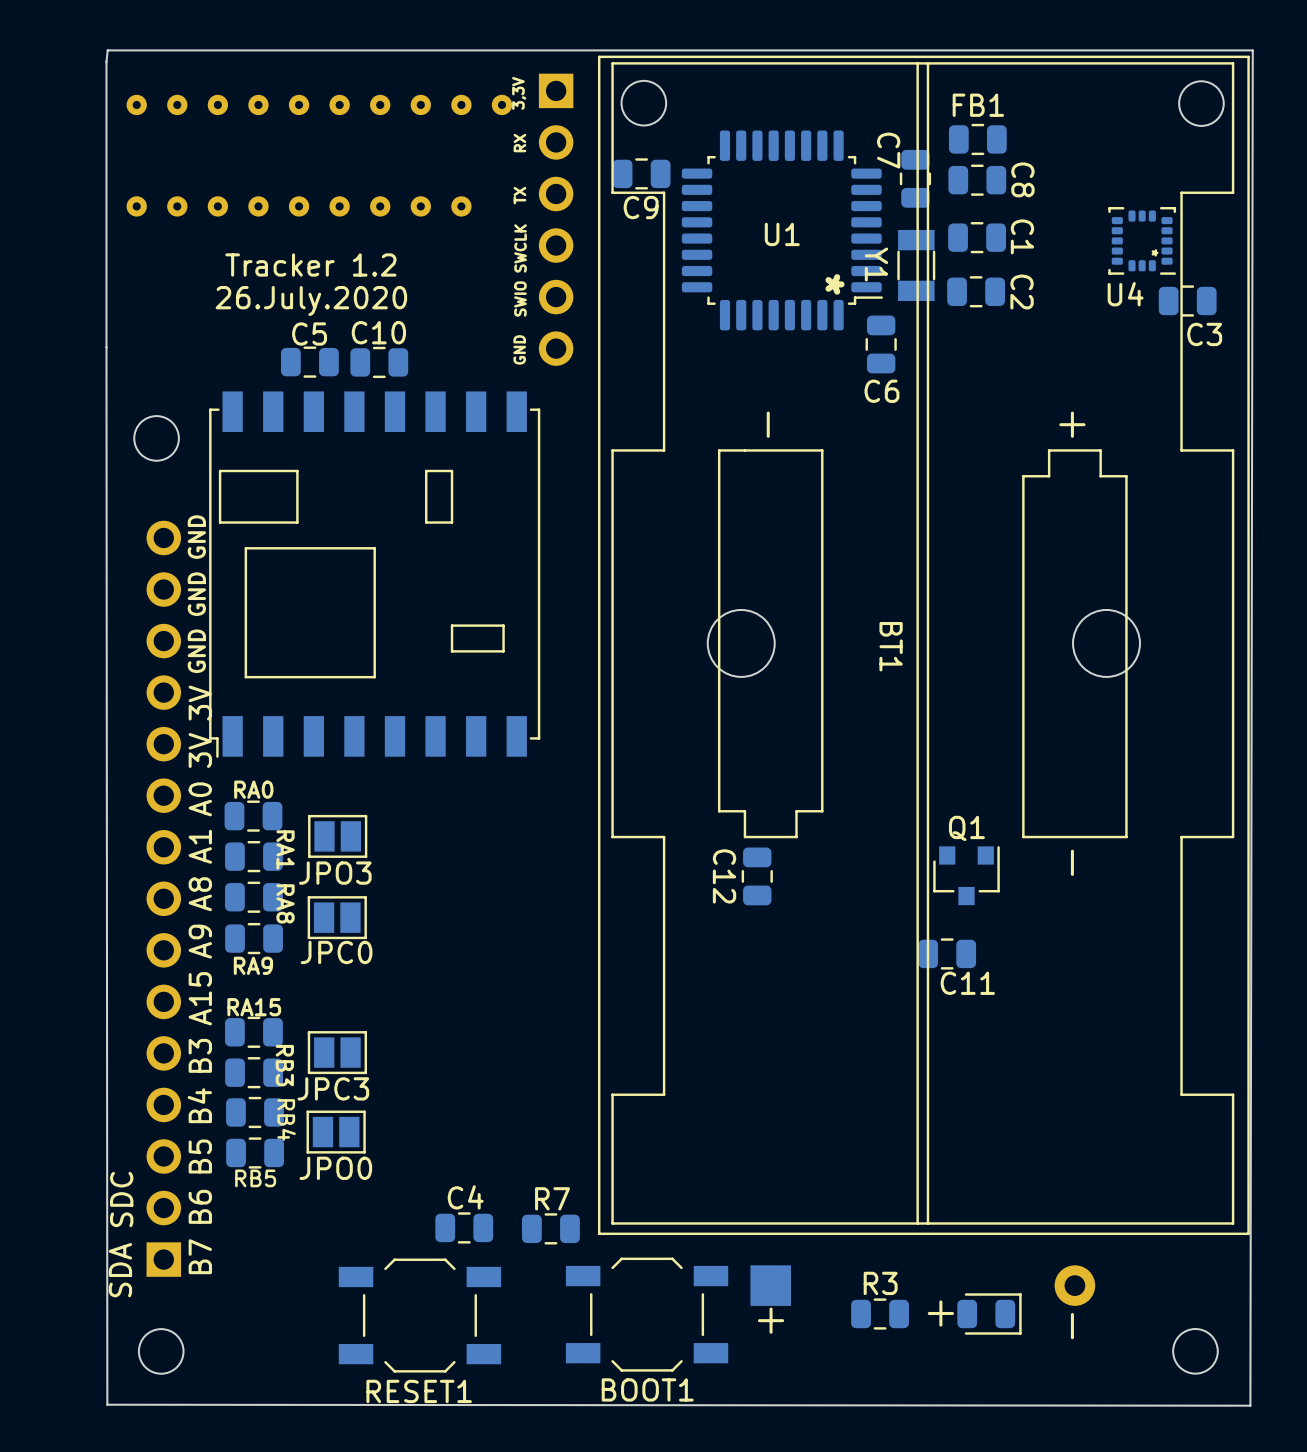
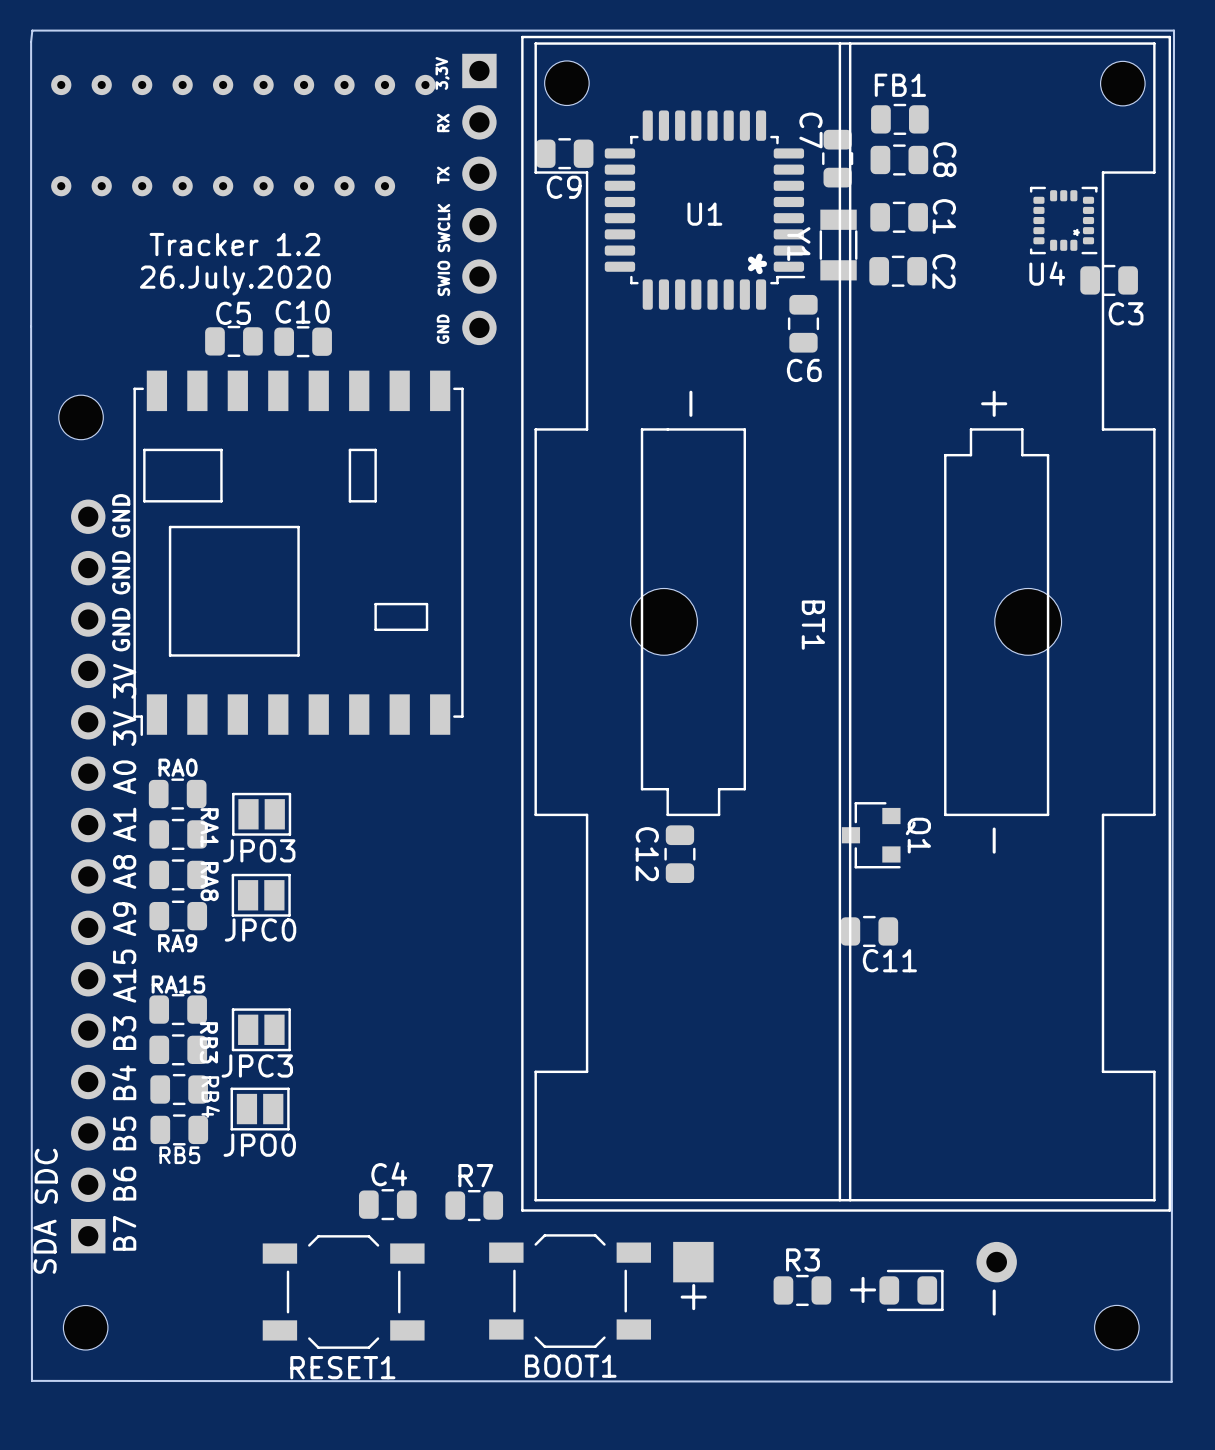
Q1 rotation: 0° (966, 875) -> 90° clockwise (871, 835)

